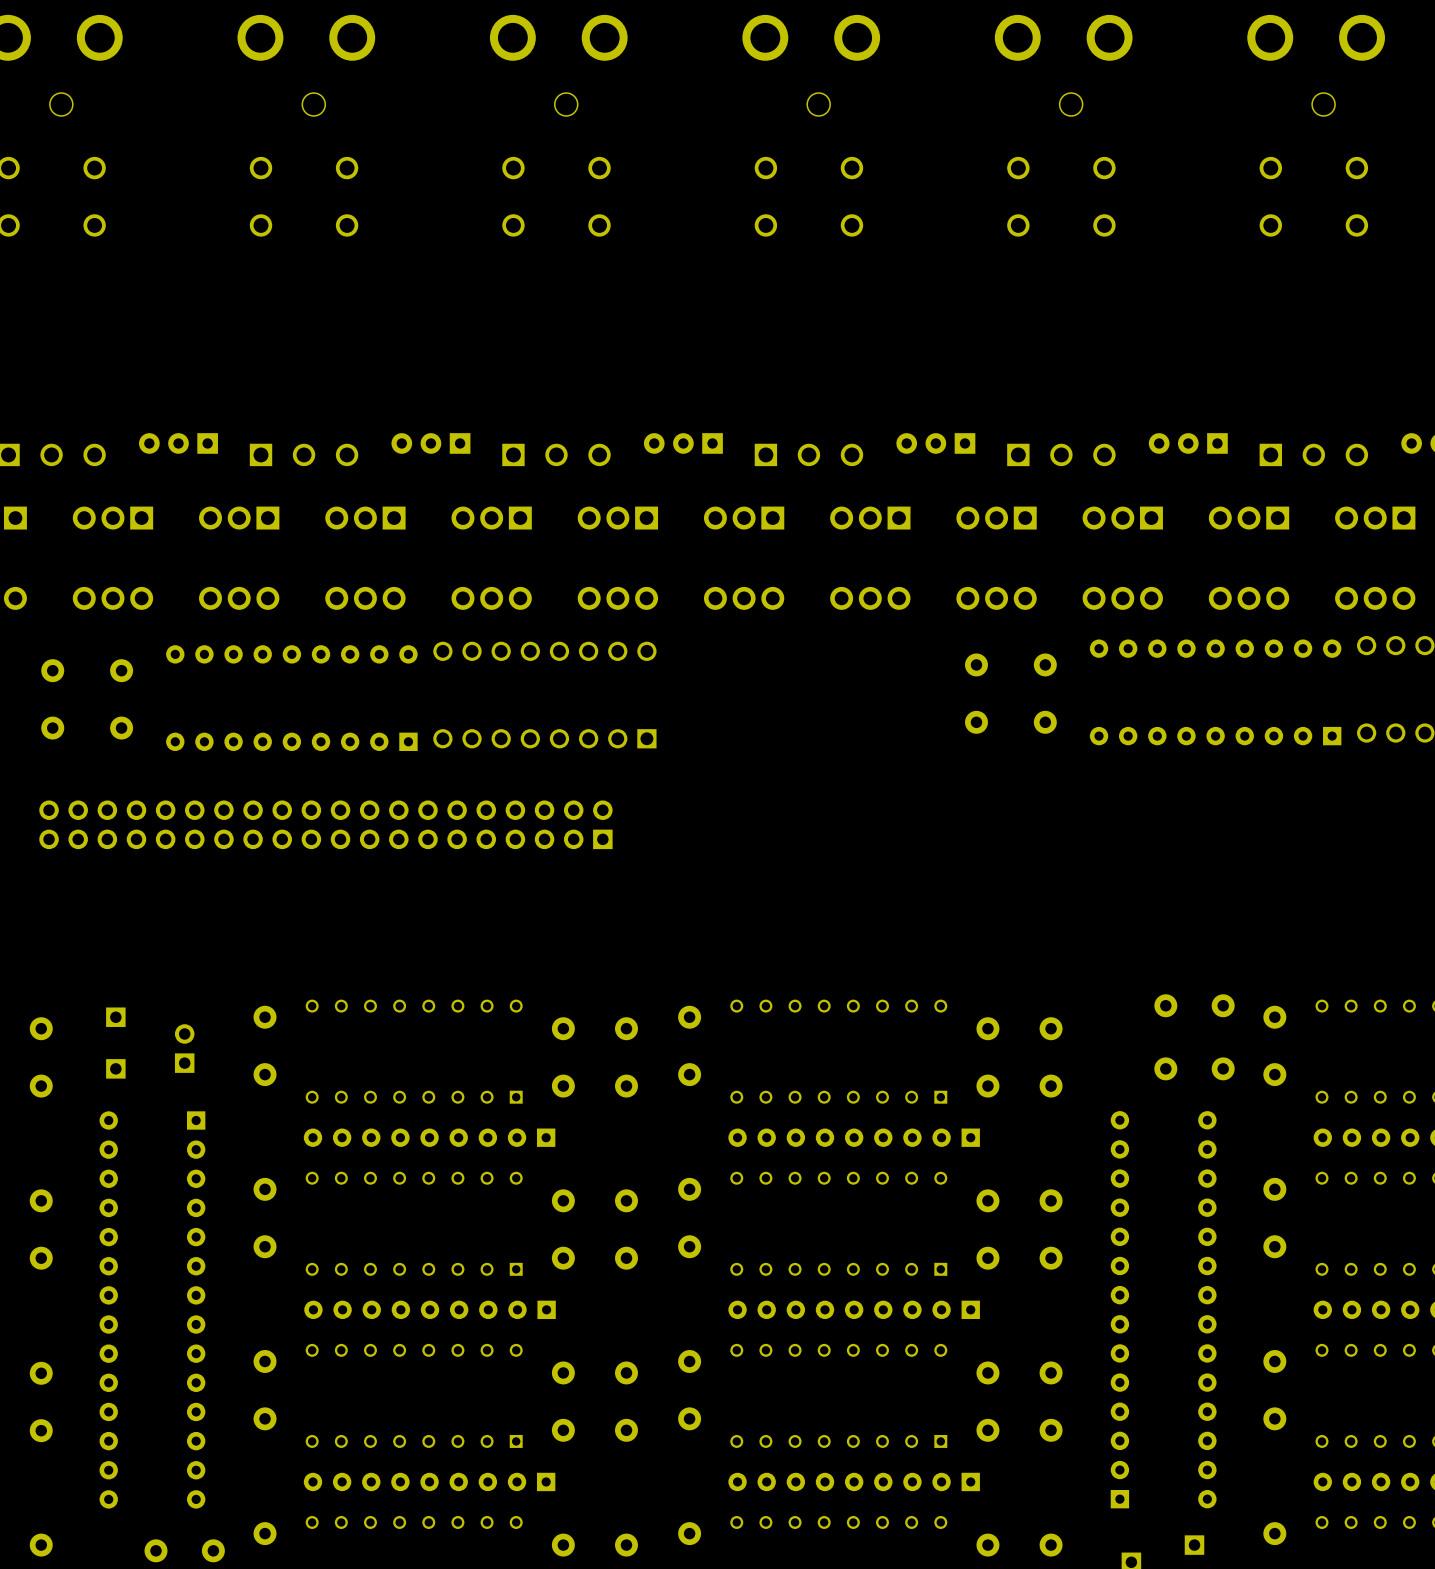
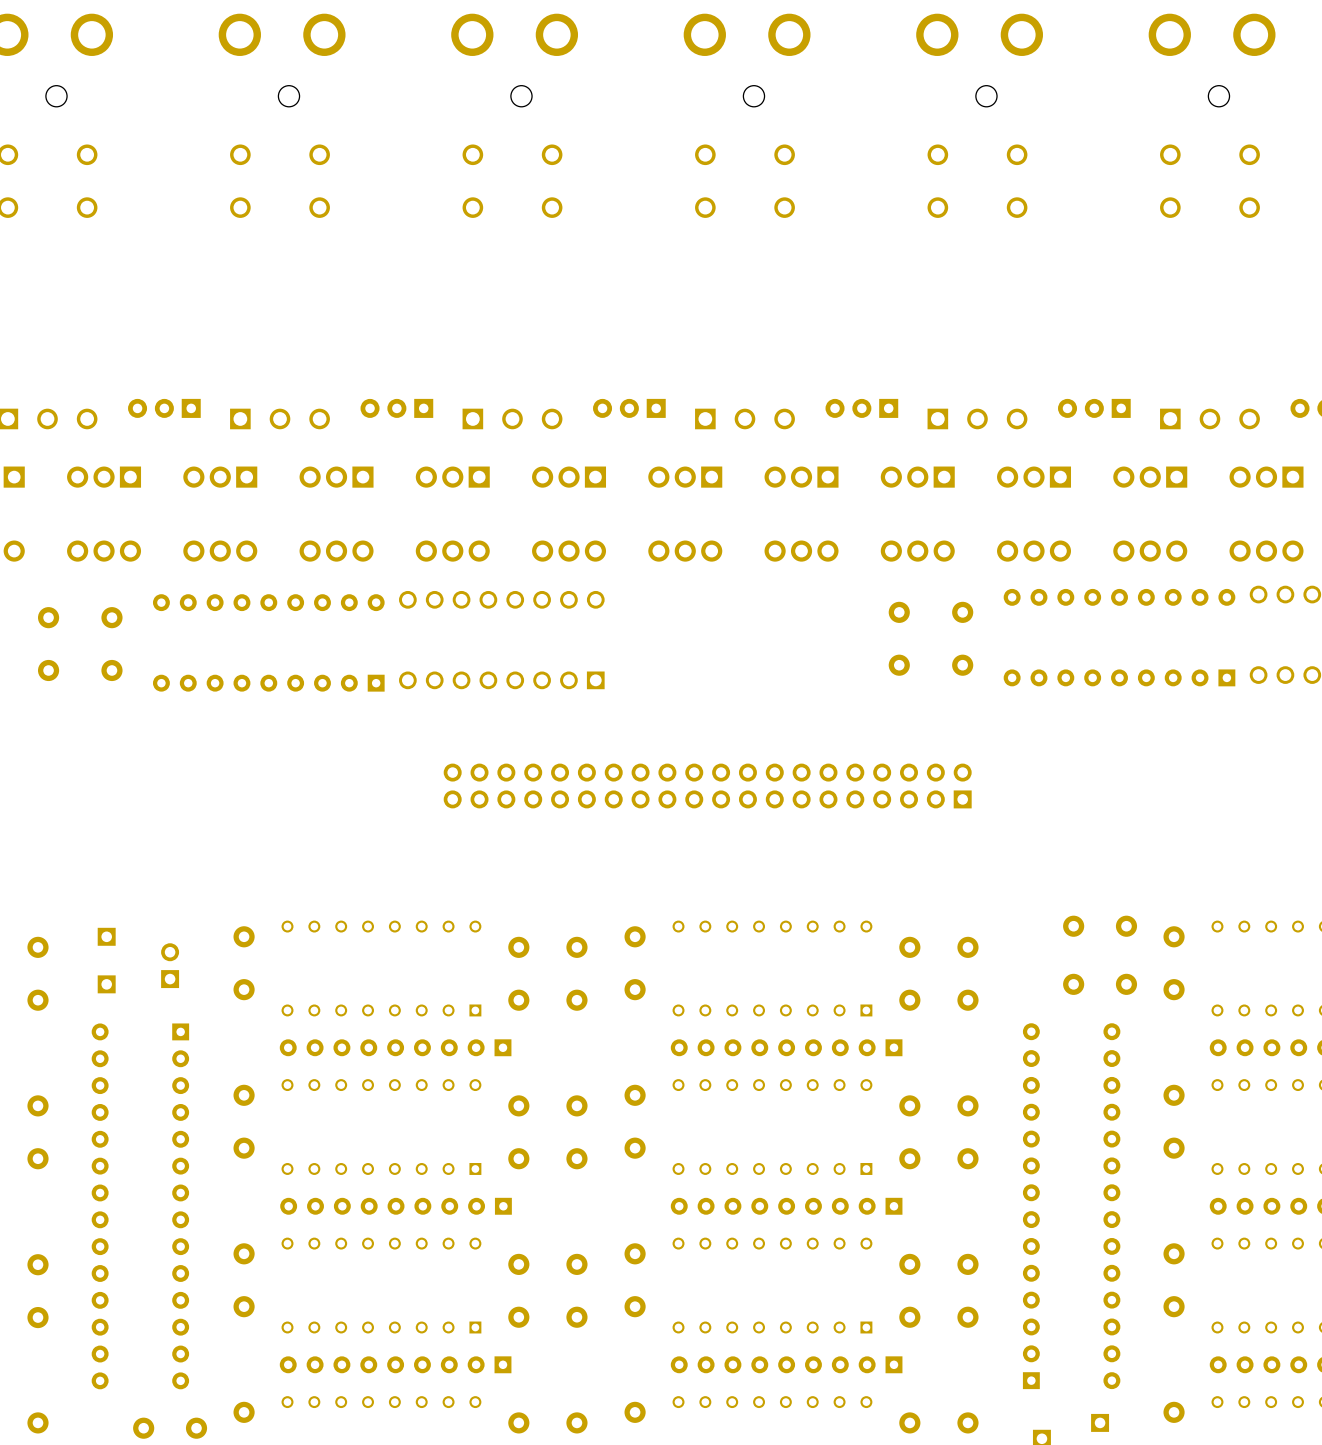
part: (325, 824) -> none
part: none -> (707, 785)

